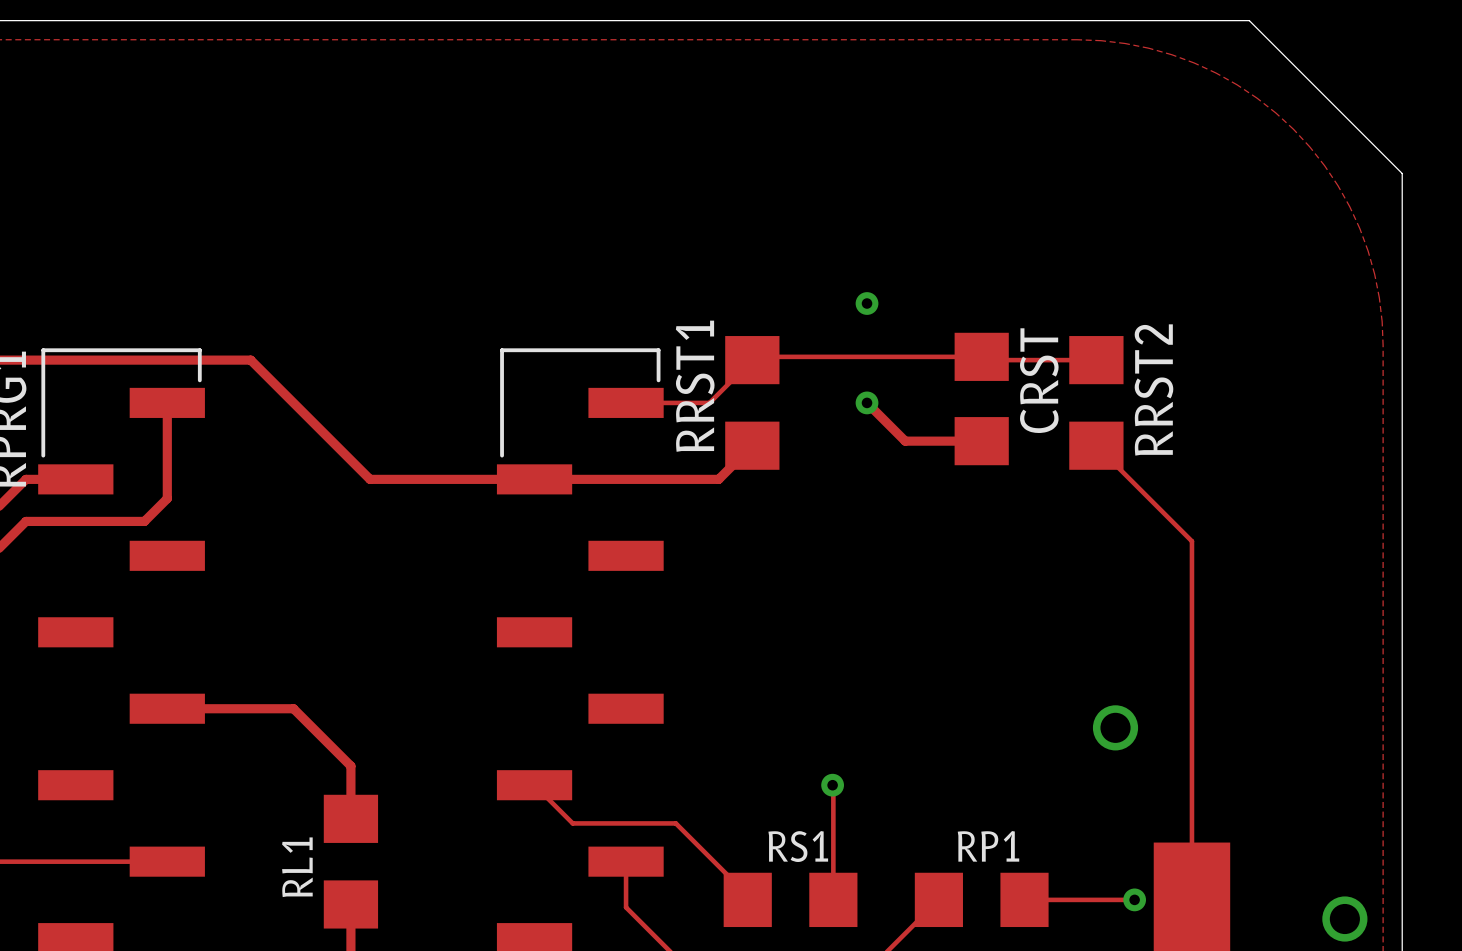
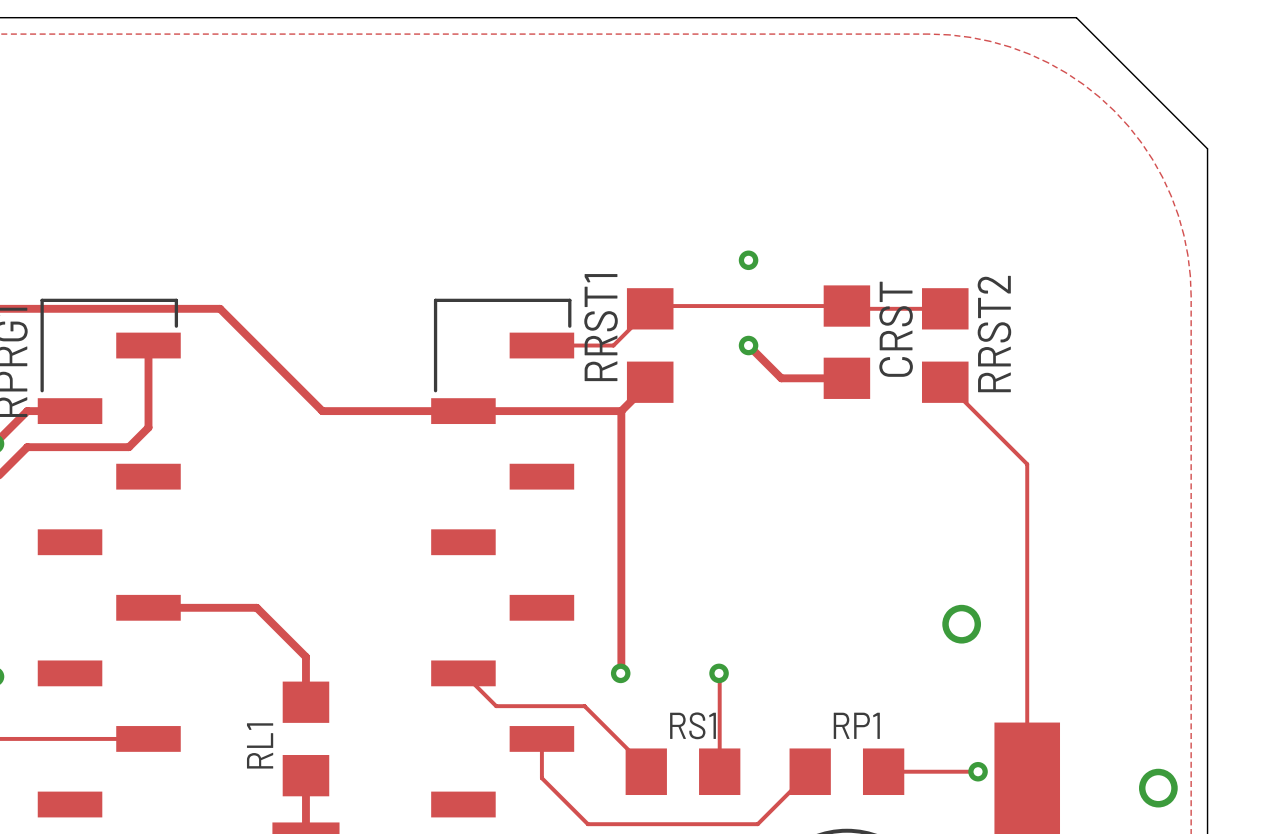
track: none -> (621, 411) (620, 673)
via: none -> (620, 673)

